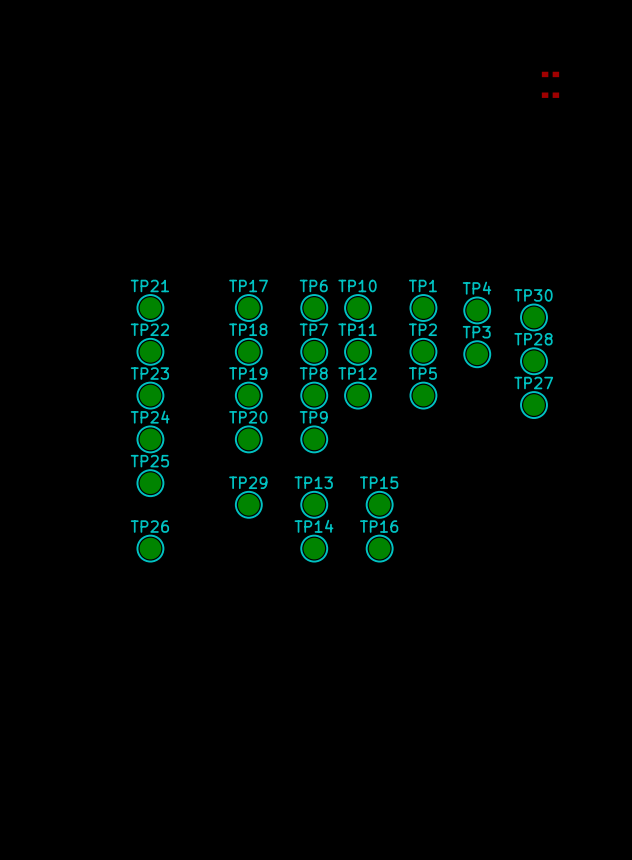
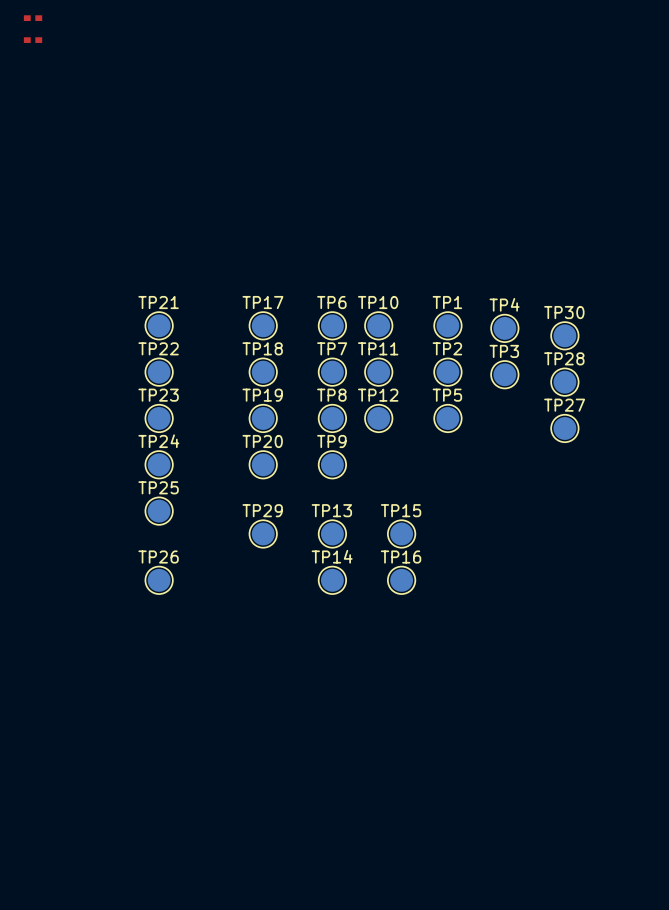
part: none -> (33, 18)
part: none -> (33, 40)
part: (550, 74) -> none
part: (550, 95) -> none

